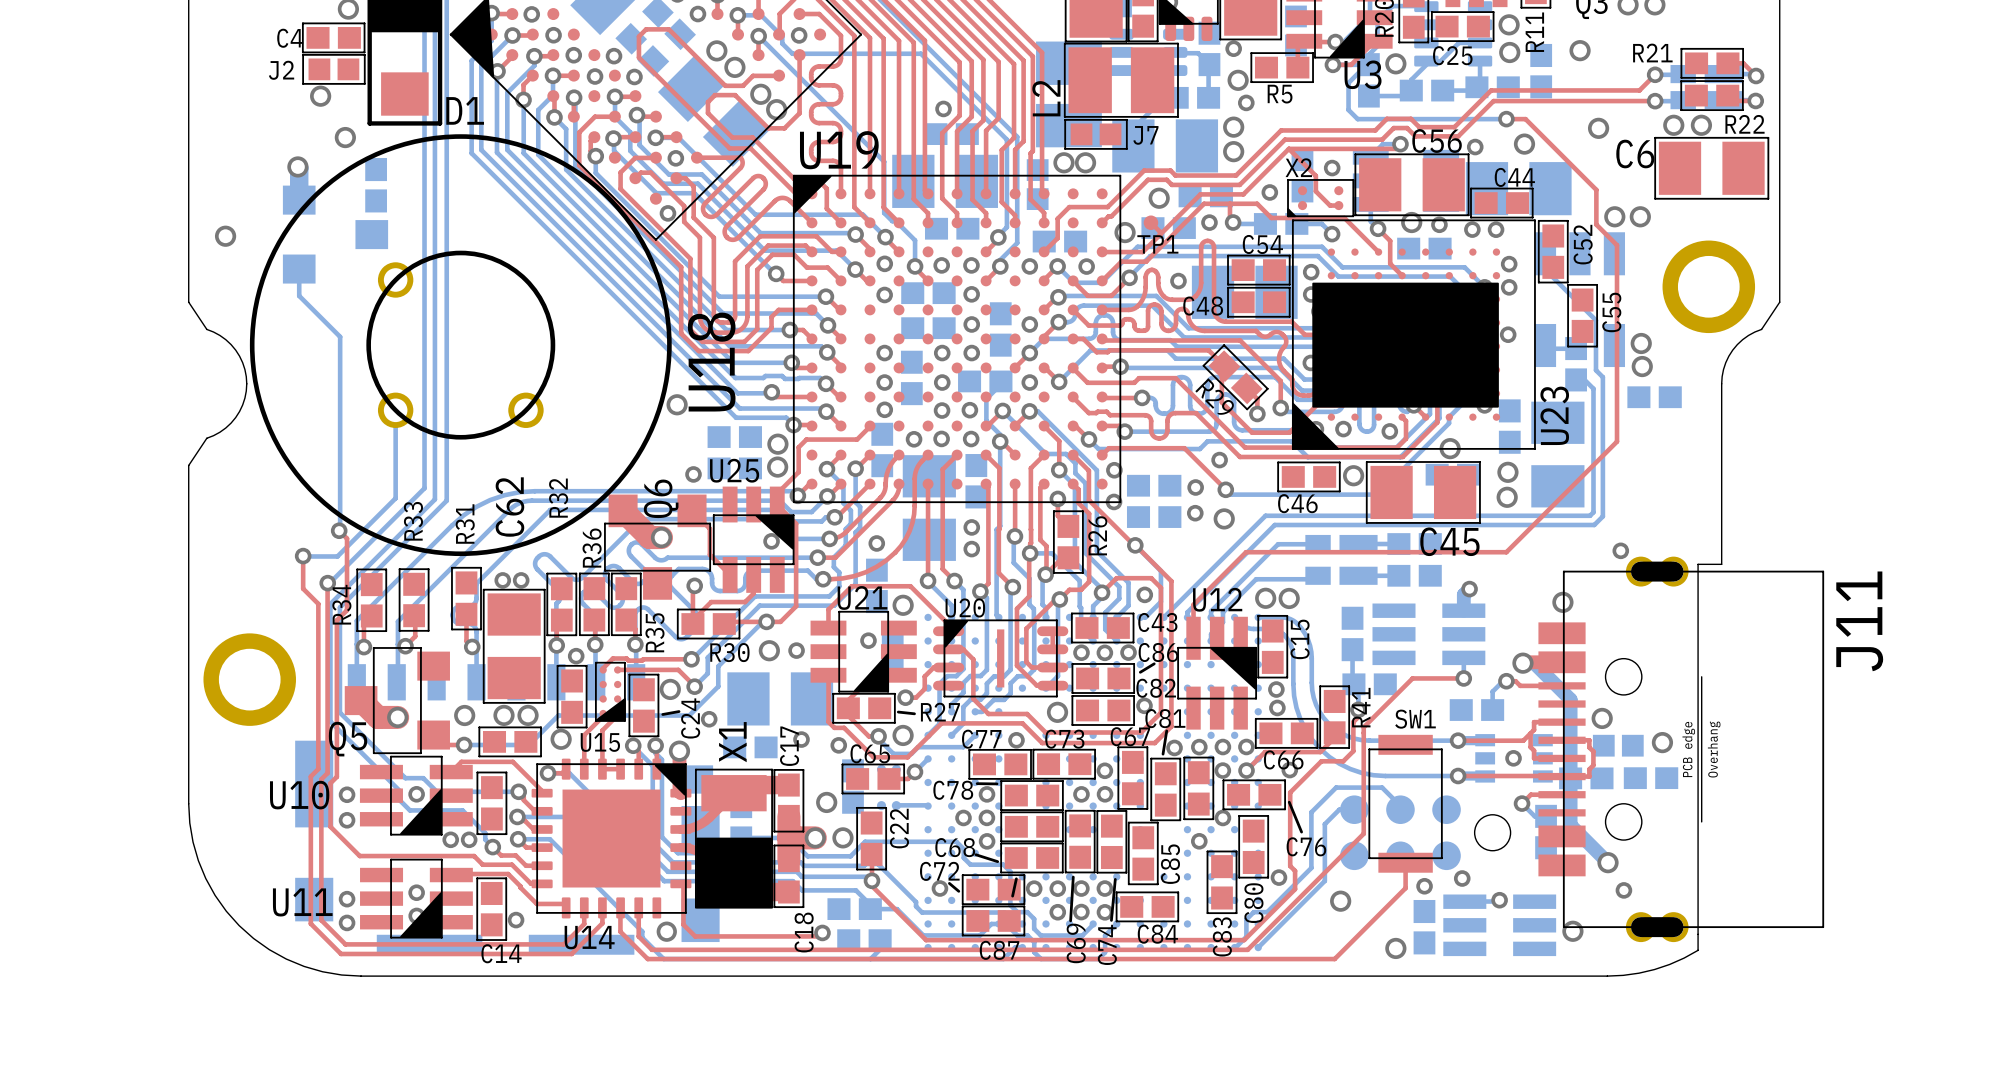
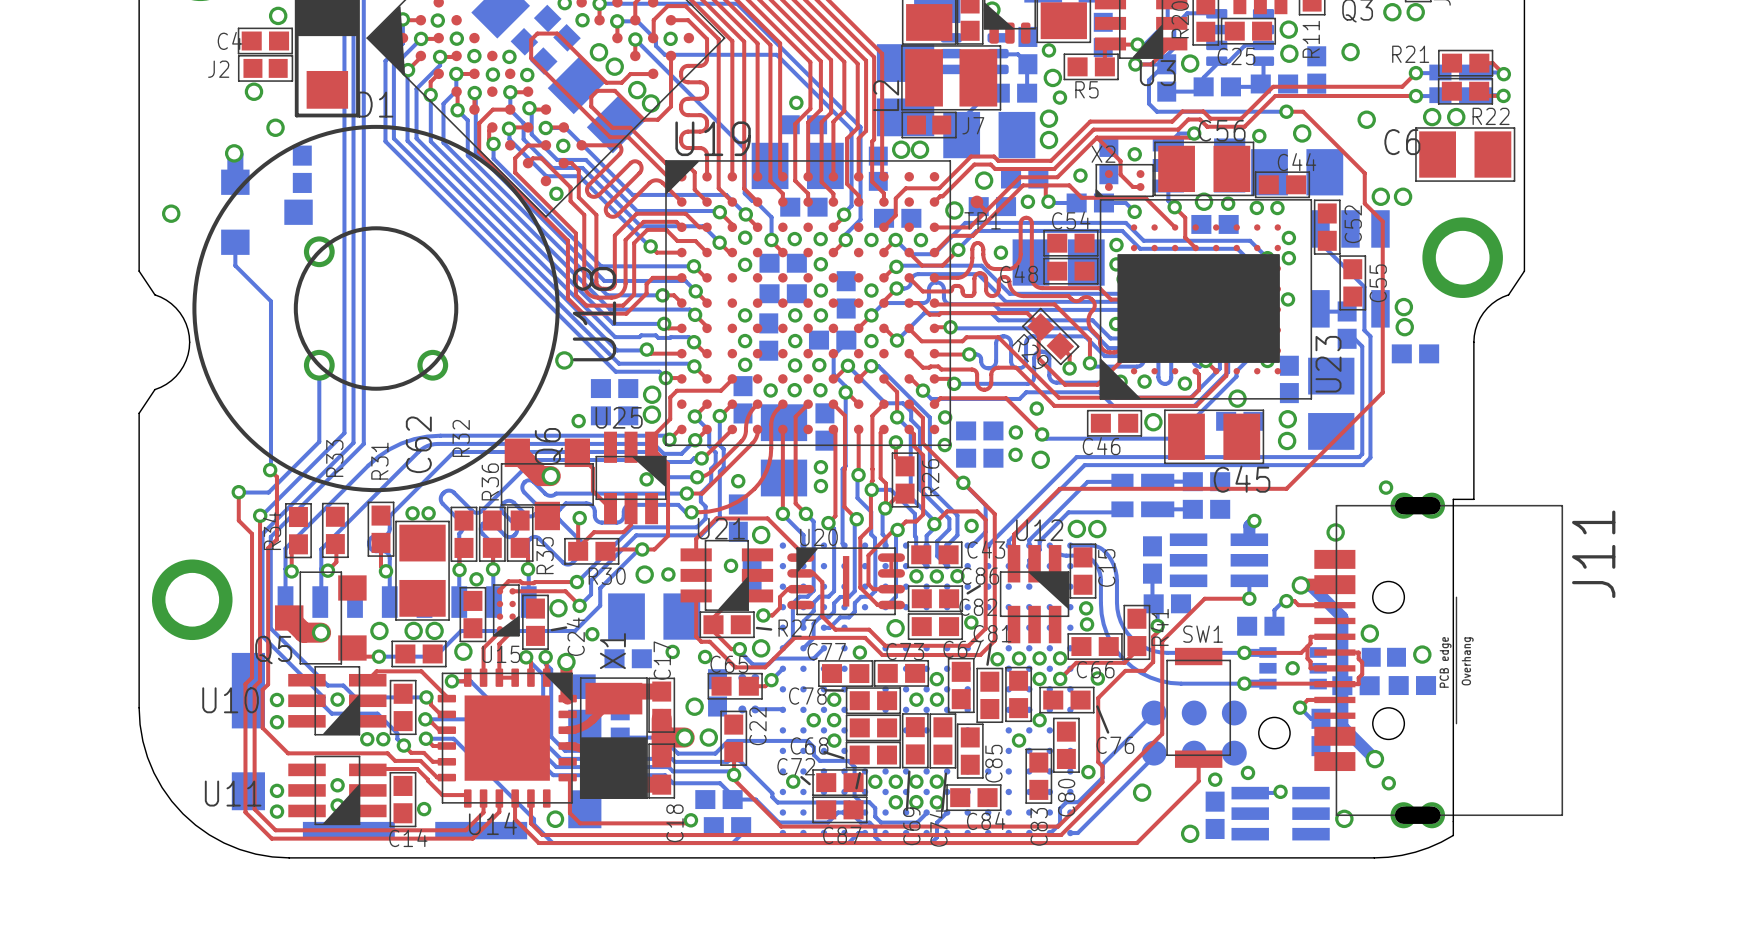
bottom track: (1354, 809) (1339, 809) (1324, 824) (1324, 880) (1258, 947) -> (1154, 753) (1154, 756) (1077, 833) (1070, 833)
bottom track: (1400, 809) (1400, 805) (1382, 787) (1336, 787) (1311, 812) (1311, 867) (1295, 883) -> (1154, 713) (1102, 764) (1102, 777)

